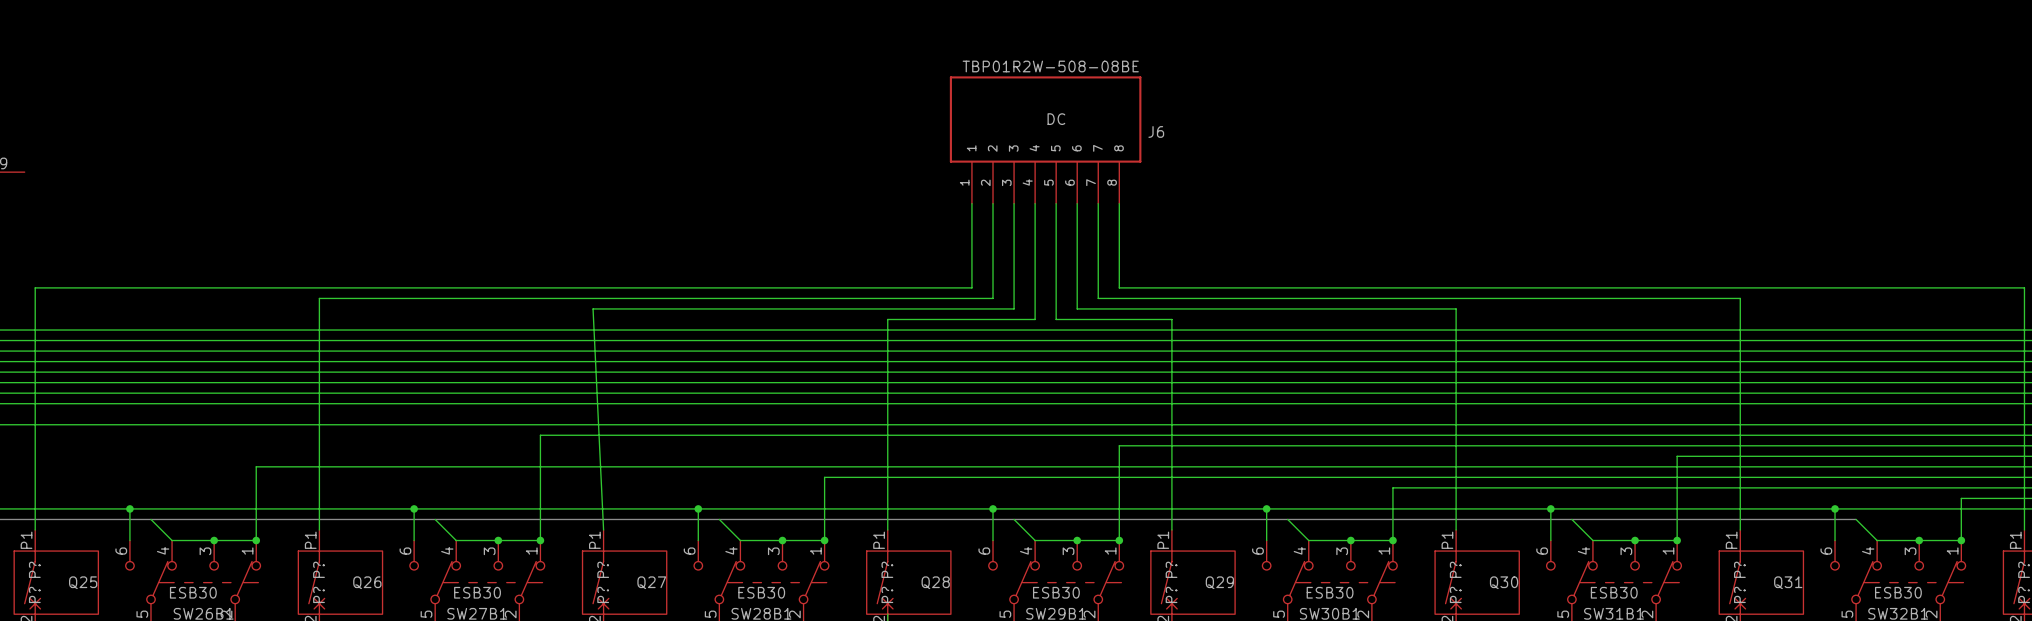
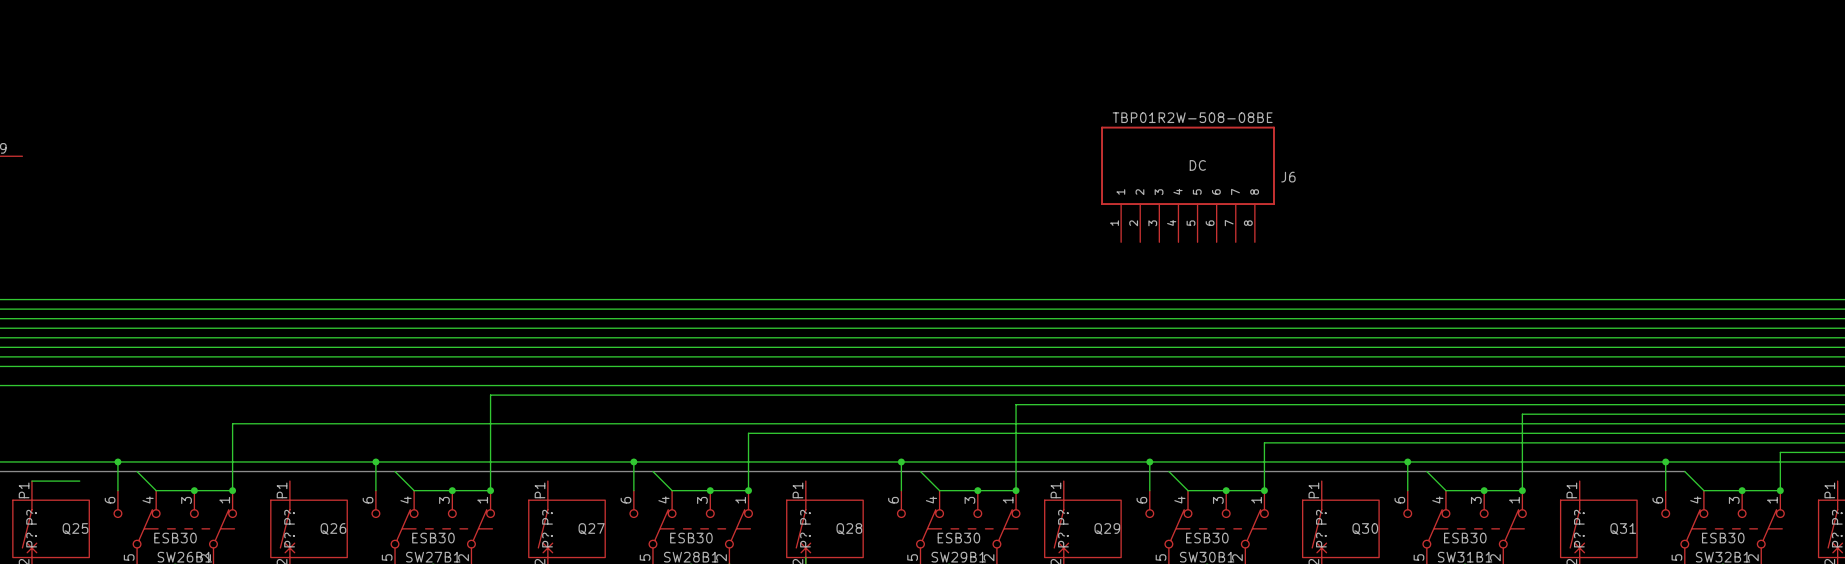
J6 position: (1045, 140) -> (1188, 184)
wire: (971, 203) (971, 287) (35, 287) (35, 529) -> (79, 481) (31, 481)
wire: (993, 203) (993, 298) (319, 298) (319, 529) -> none
wire: (1014, 203) (1014, 308) (593, 308) (603, 529) -> none
wire: (1035, 203) (1035, 319) (887, 319) (887, 529) -> none
wire: (1056, 203) (1056, 319) (1171, 319) (1171, 529) -> none
wire: (1077, 203) (1077, 308) (1456, 308) (1456, 529) -> none
wire: (1098, 203) (1098, 298) (1740, 298) (1740, 529) -> none
wire: (1119, 203) (1119, 287) (2024, 287) (2024, 529) -> none

